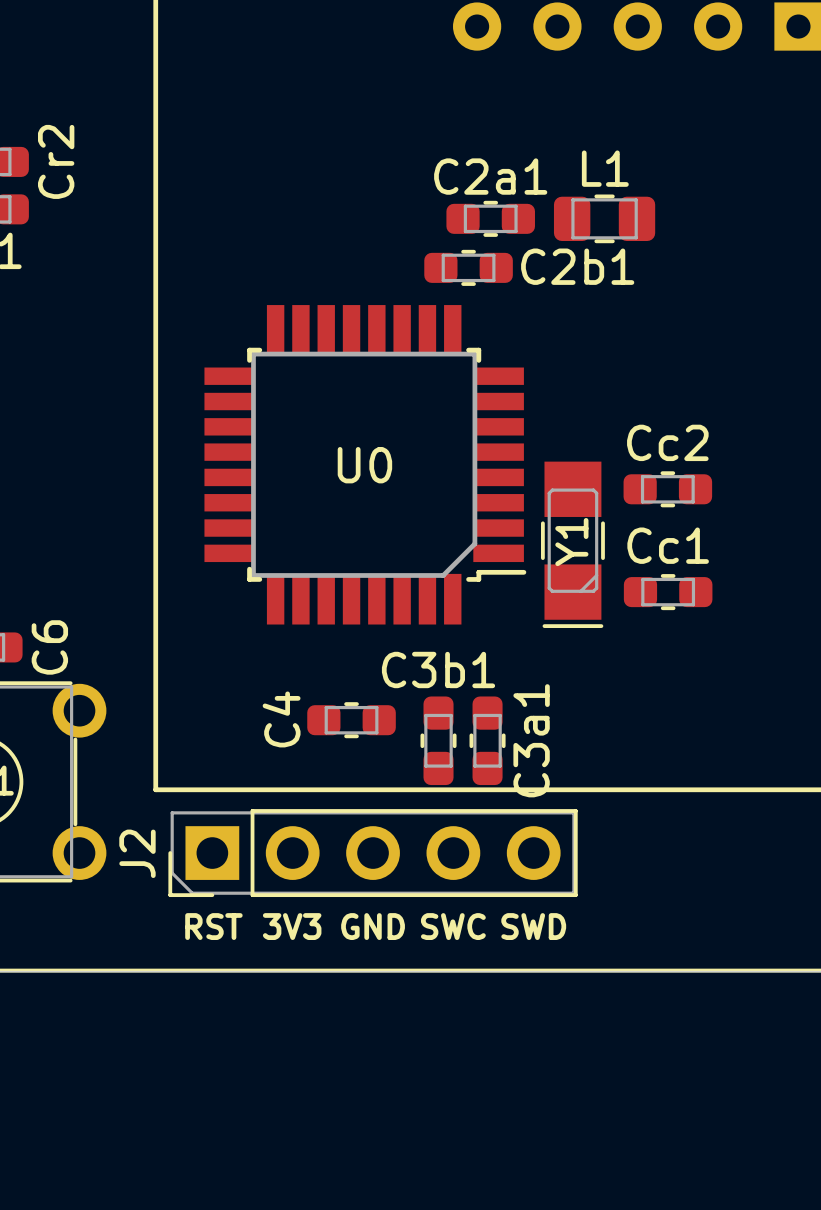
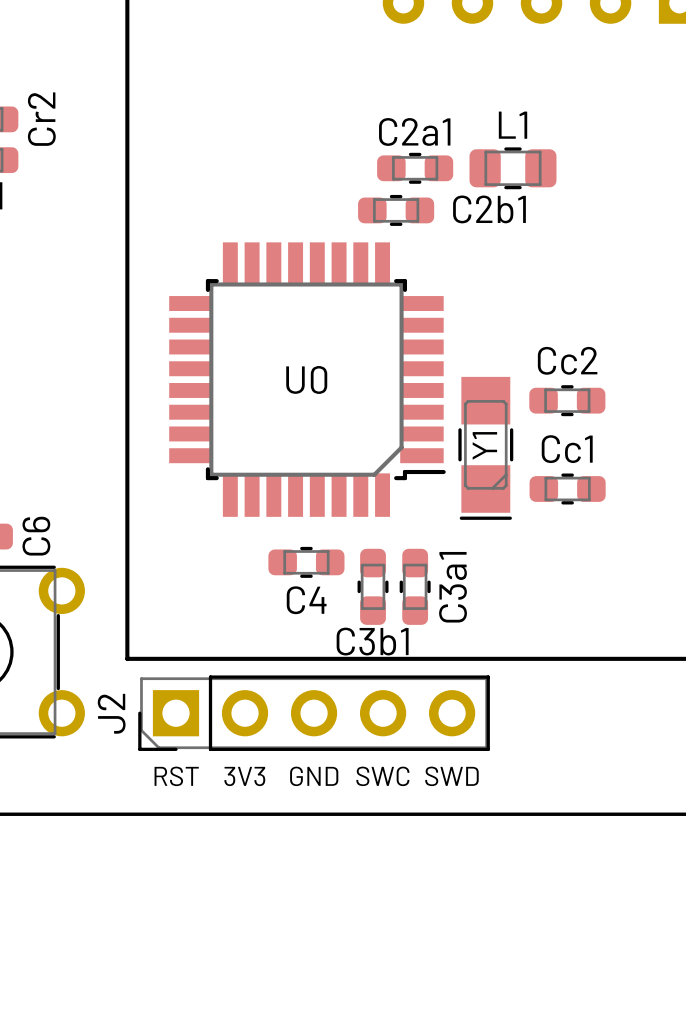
C3b1 name position: C3b1 (438, 669) -> C3b1 (372, 641)
C4 name rotation: 0° (281, 719) -> 90° clockwise (306, 600)
C4 name position: C4 (281, 719) -> C4 (306, 600)
C4 position: (351, 720) -> (306, 562)
C3b1 position: (438, 740) -> (373, 586)
C3a1 position: (487, 740) -> (415, 586)

